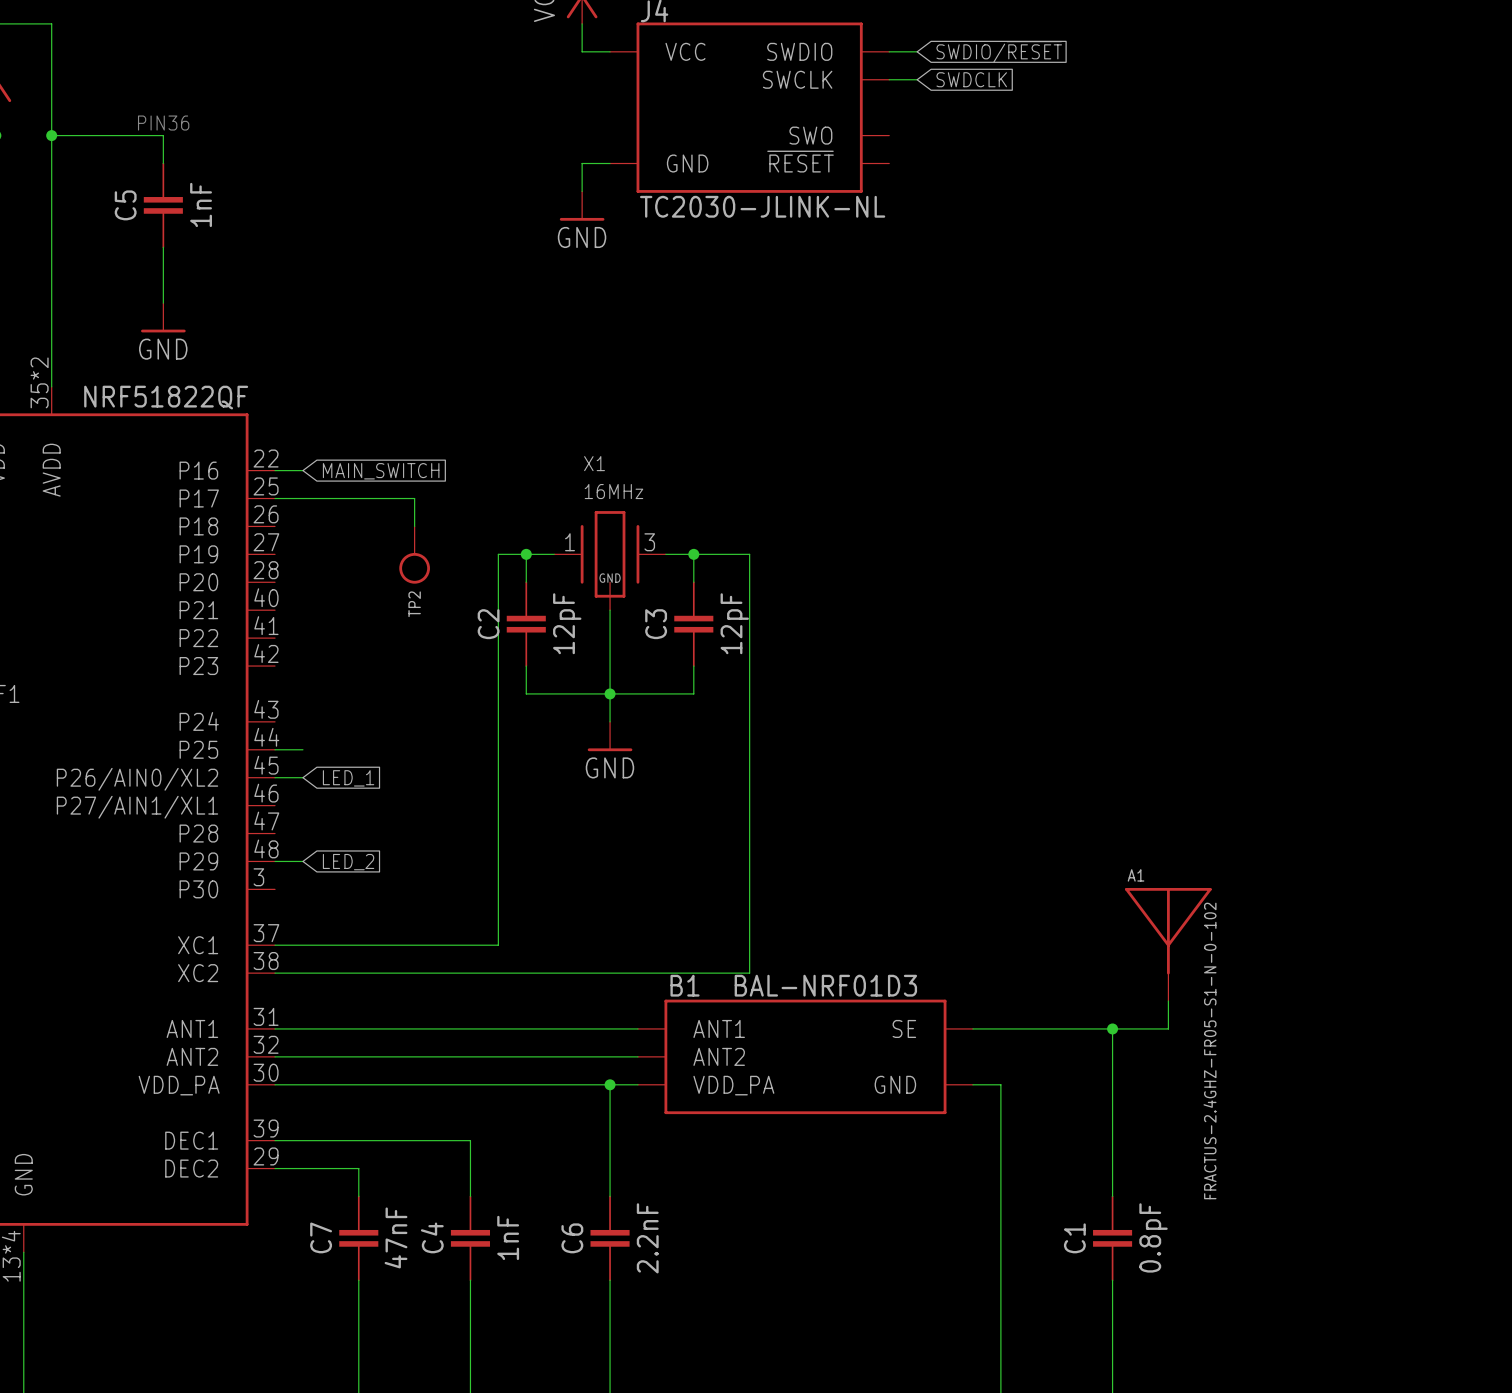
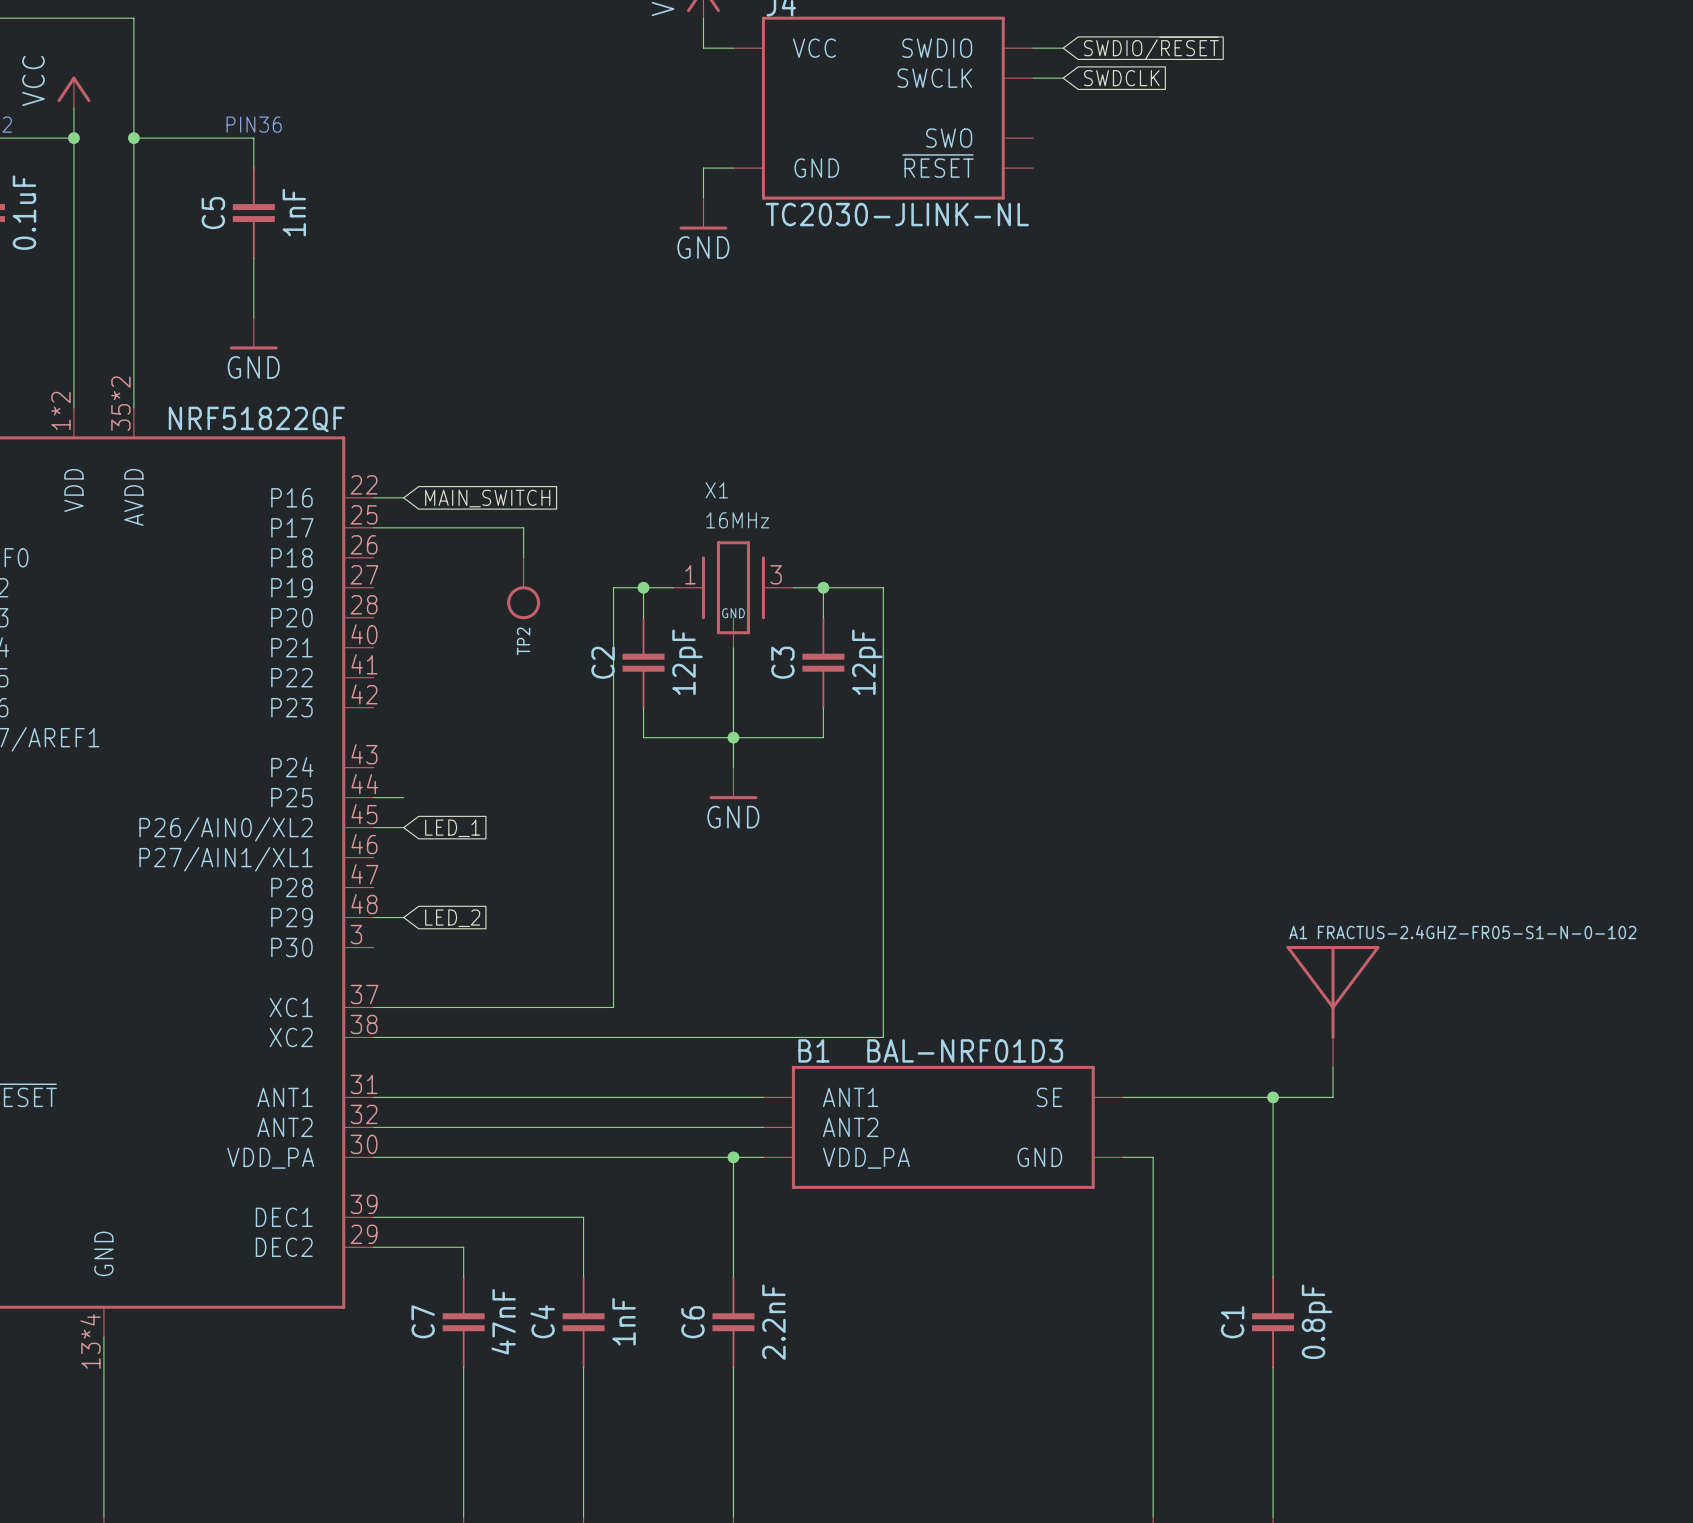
A1 value rotation: 0° (1210, 1050) -> 90° clockwise (1477, 932)

